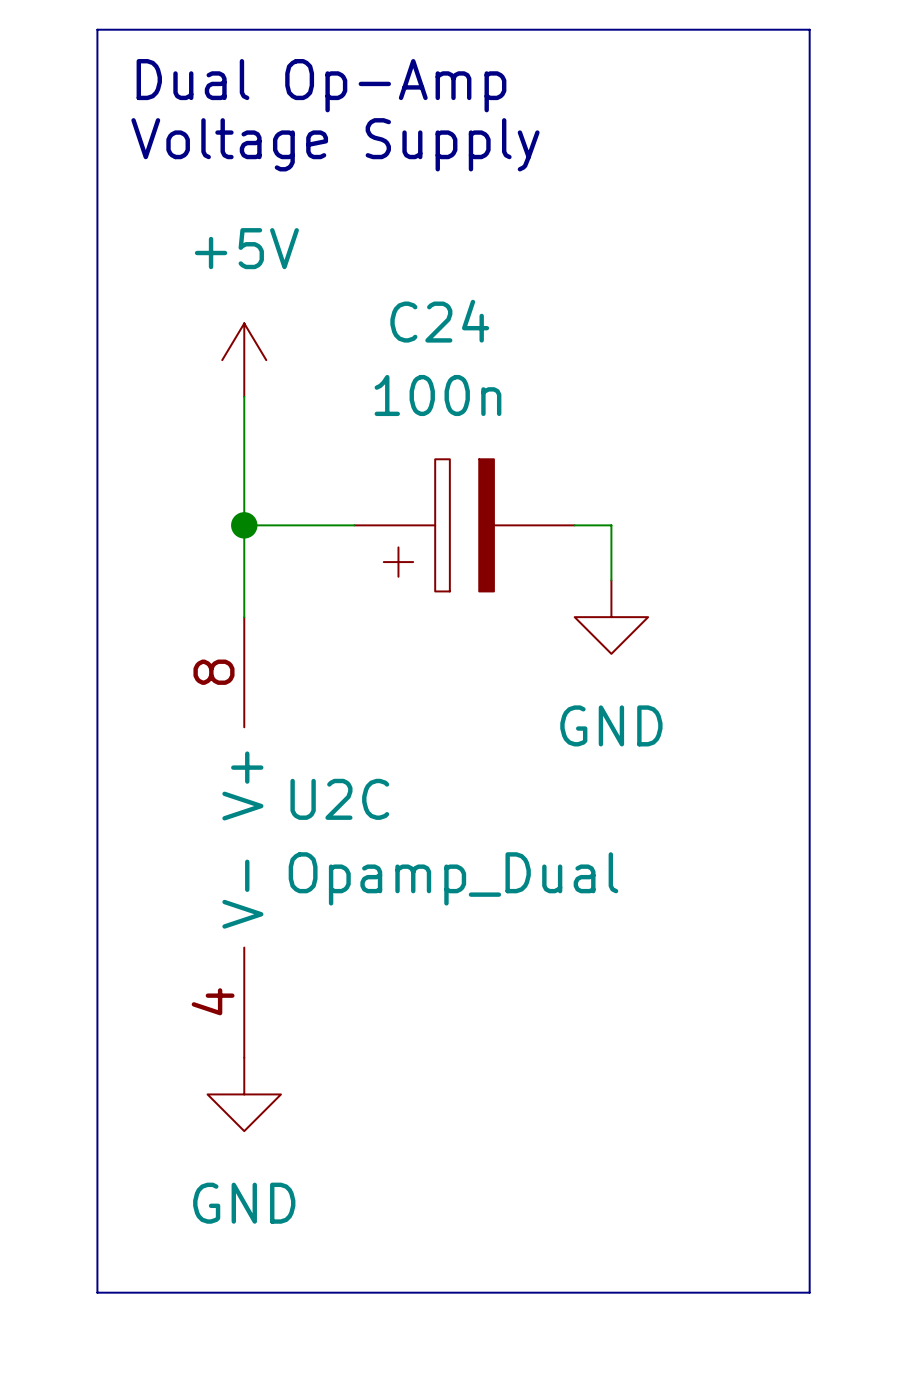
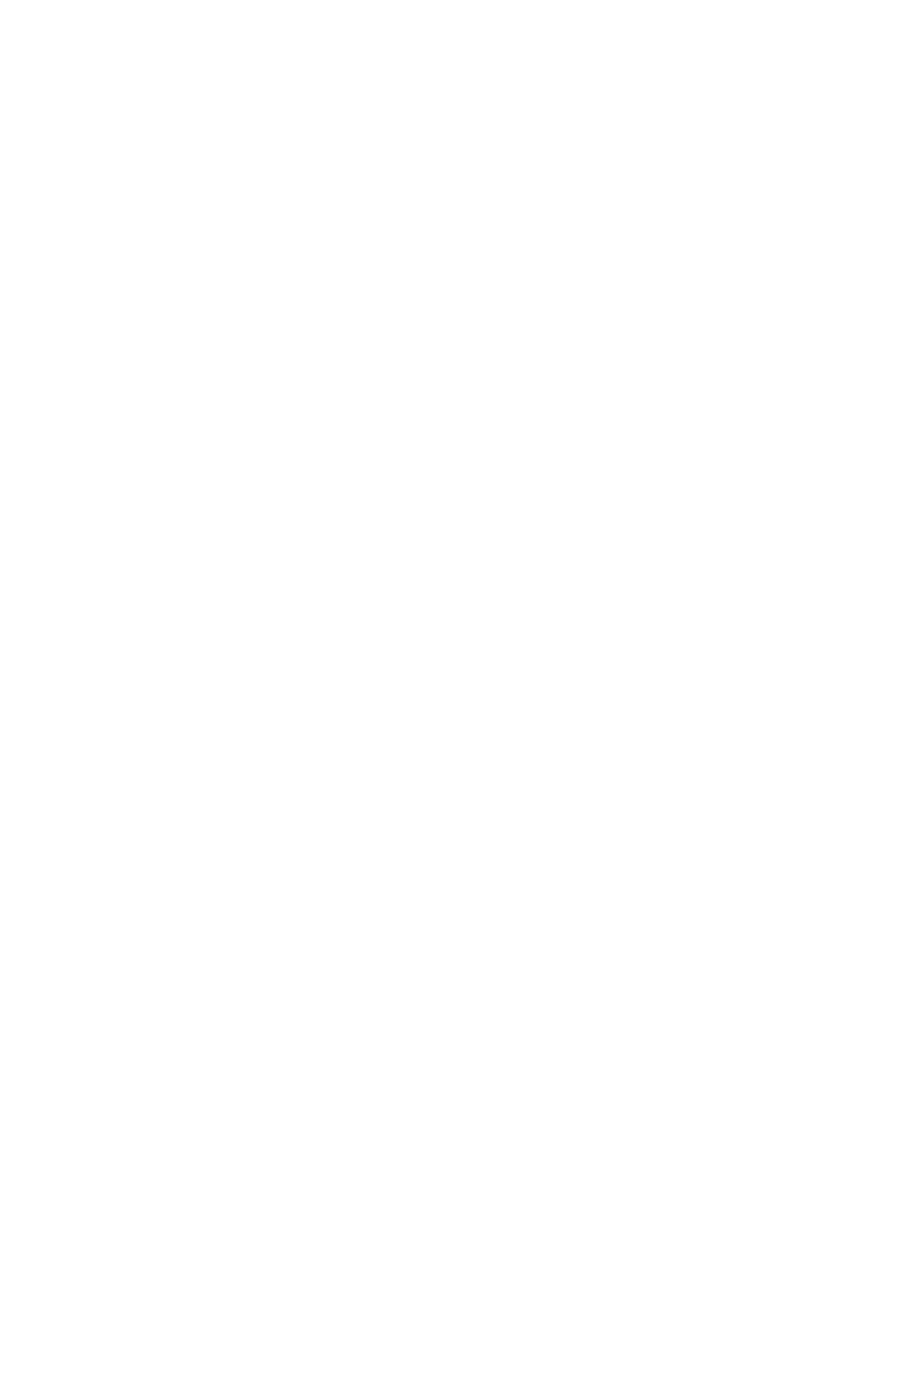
line: (97, 29) (809, 29) (809, 1292) (97, 1292) (97, 29) -> none
text: Dual Op-Amp (321, 85) -> none
text: Voltage Supply (335, 144) -> none
power symbol: +5V (244, 360) -> none
wire: (244, 396) (244, 617) -> none
wire: (244, 525) (354, 525) -> none
junction: (244, 525) -> none
C24: 100n (464, 525) -> none
wire: (574, 525) (611, 525) (611, 580) -> none
power symbol: GND (611, 617) -> none
U2C: Opamp_Dual (244, 837) -> none
power symbol: GND (244, 1094) -> none

